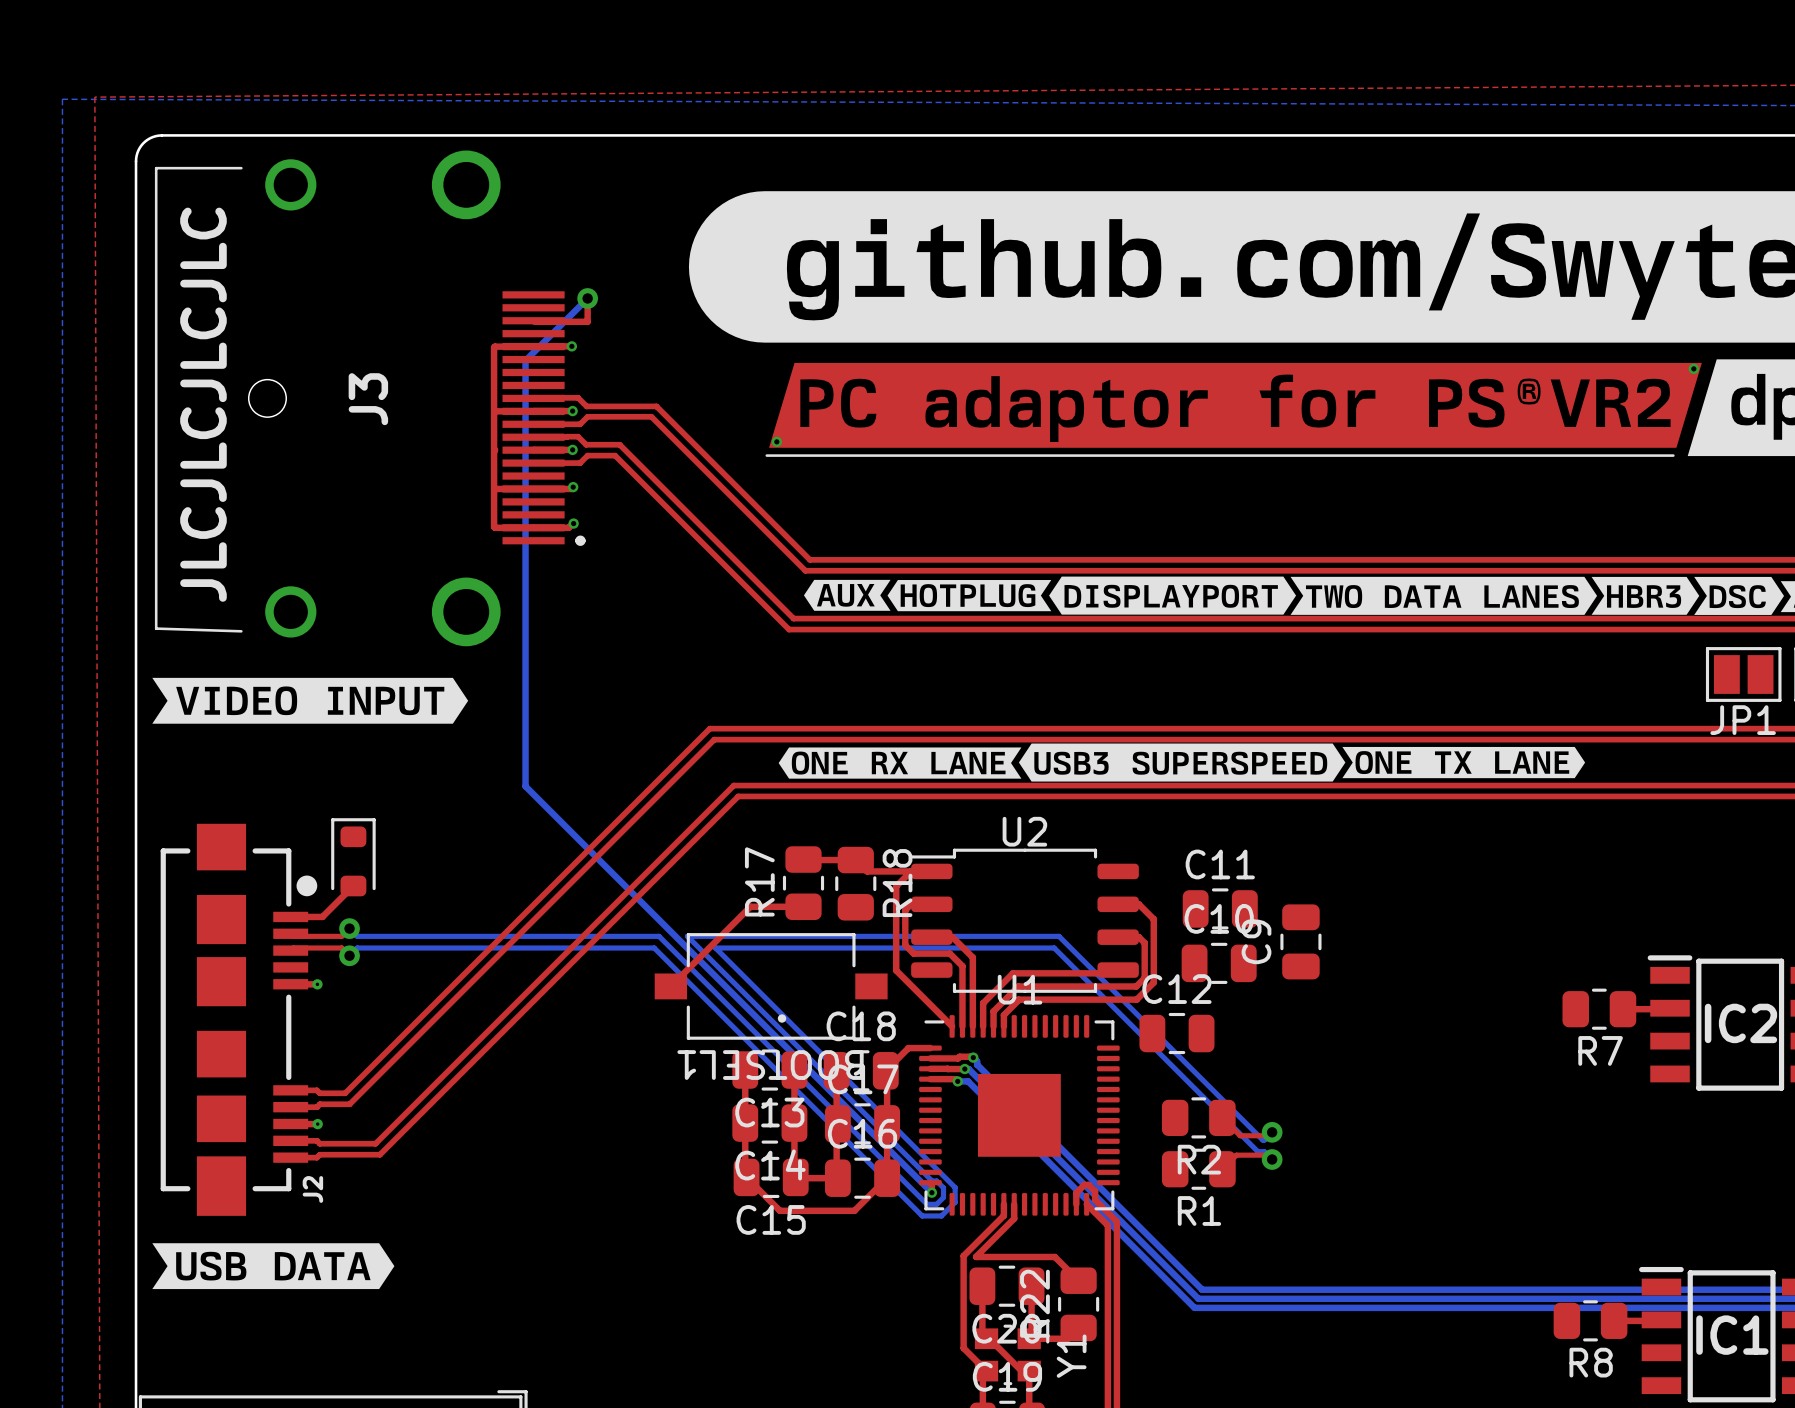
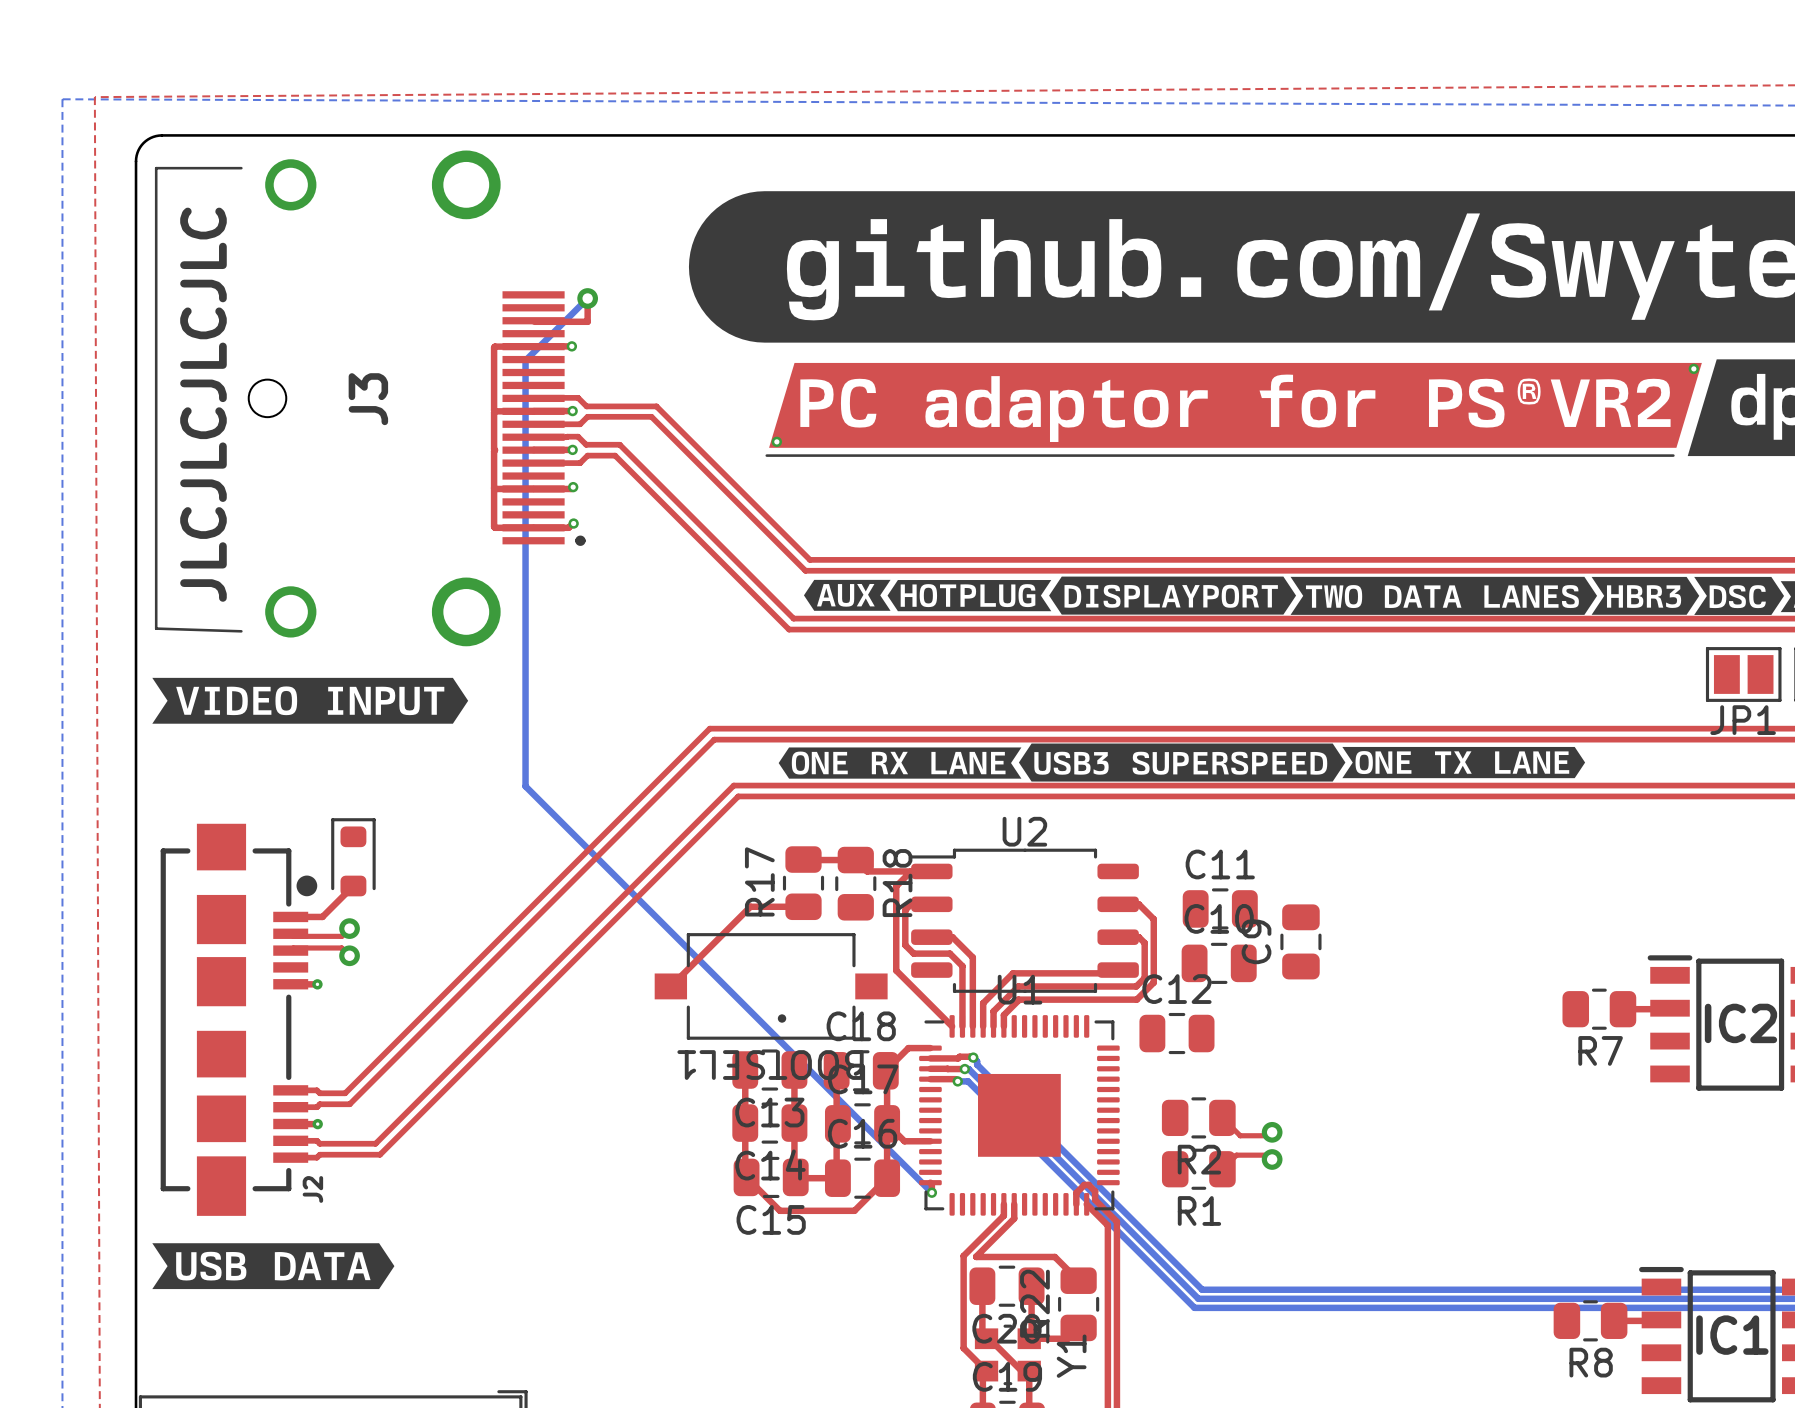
bottom track: (349, 928) (357, 936) (659, 936) (927, 1204) (936, 1204) (943, 1197) (943, 1187) (936, 1181) (932, 1181) (687, 936) (1059, 936) (1262, 1140) (1272, 1132) -> none
bottom track: (349, 955) (357, 948) (654, 948) (922, 1215) (941, 1215) (955, 1202) (955, 1187) (715, 948) (1054, 948) (1257, 1151) (1264, 1151) (1272, 1159) -> none
top track: none -> (887, 1123) (904, 1141) (930, 1141)

